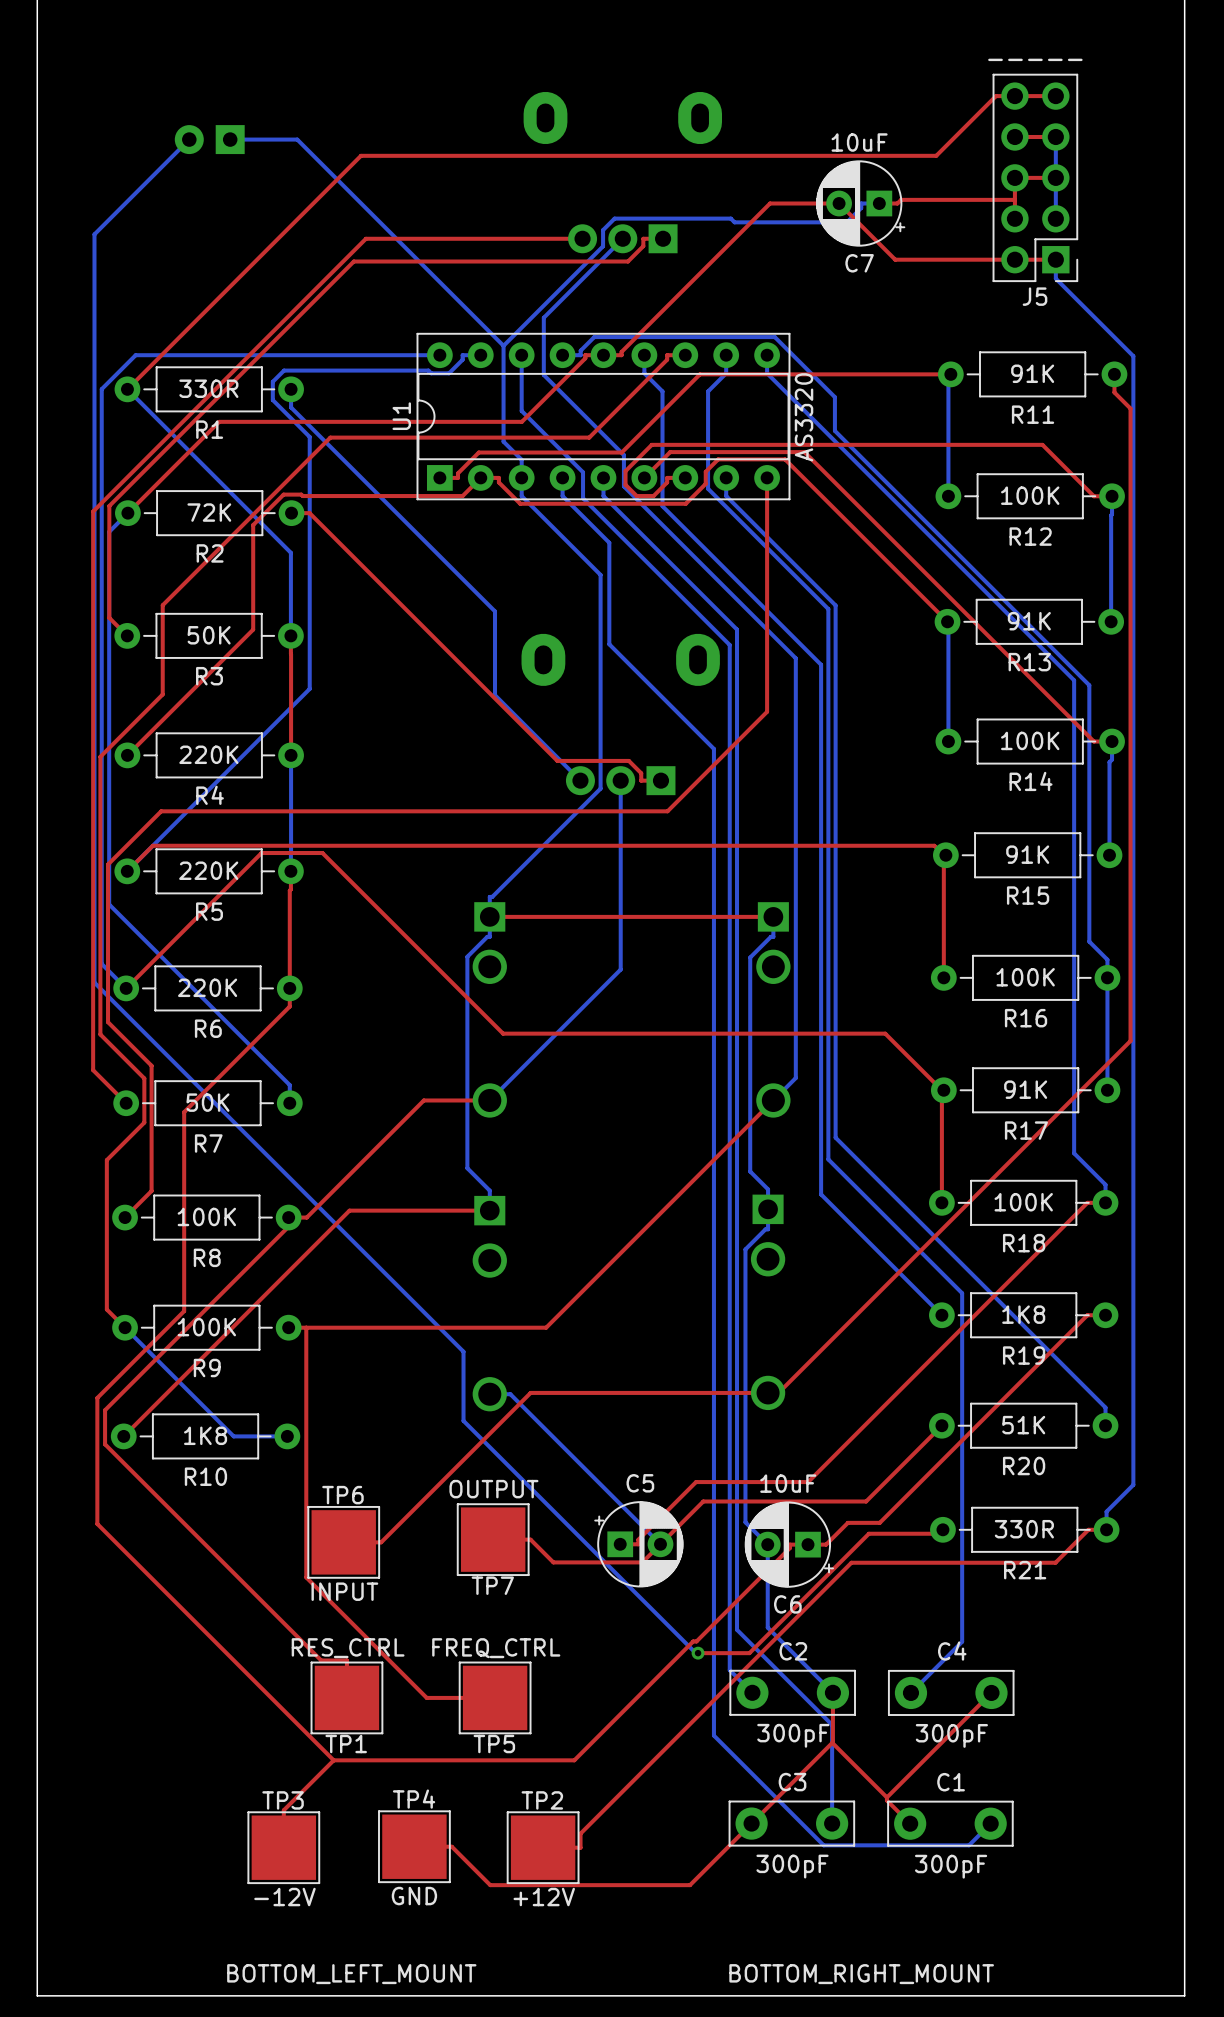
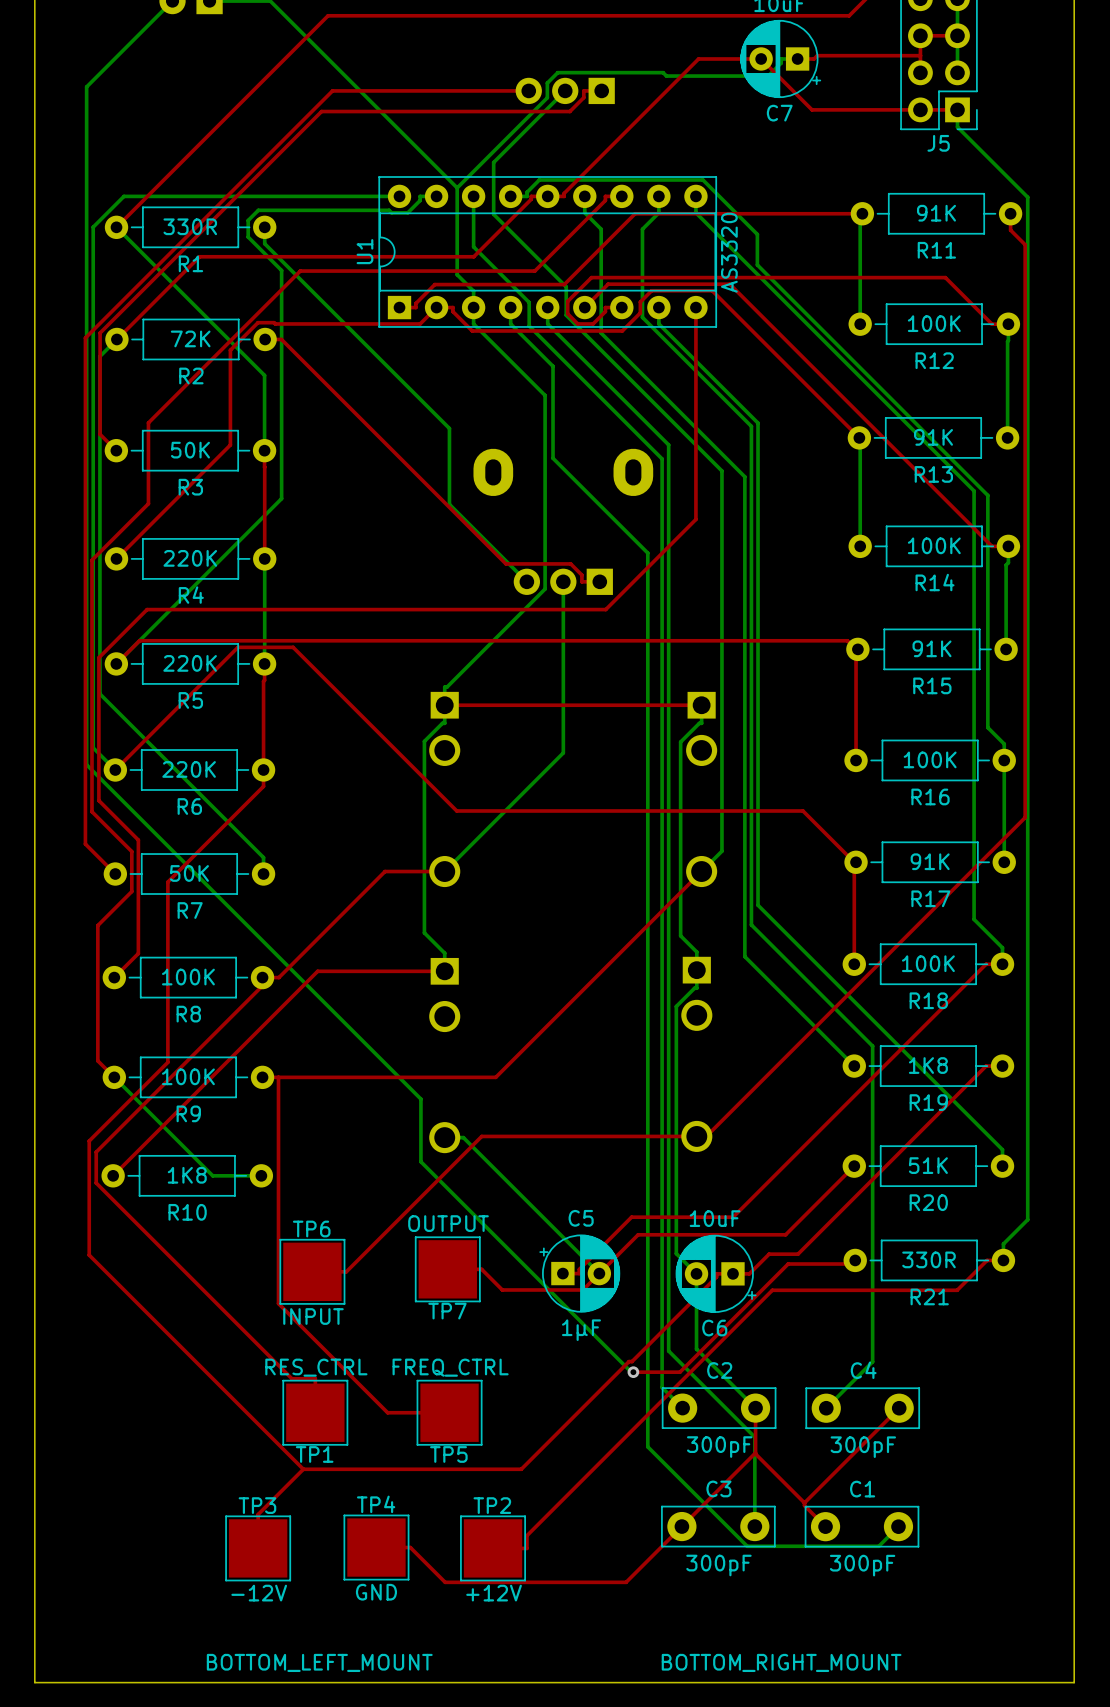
C5 value: none -> 1µF (581, 1330)

